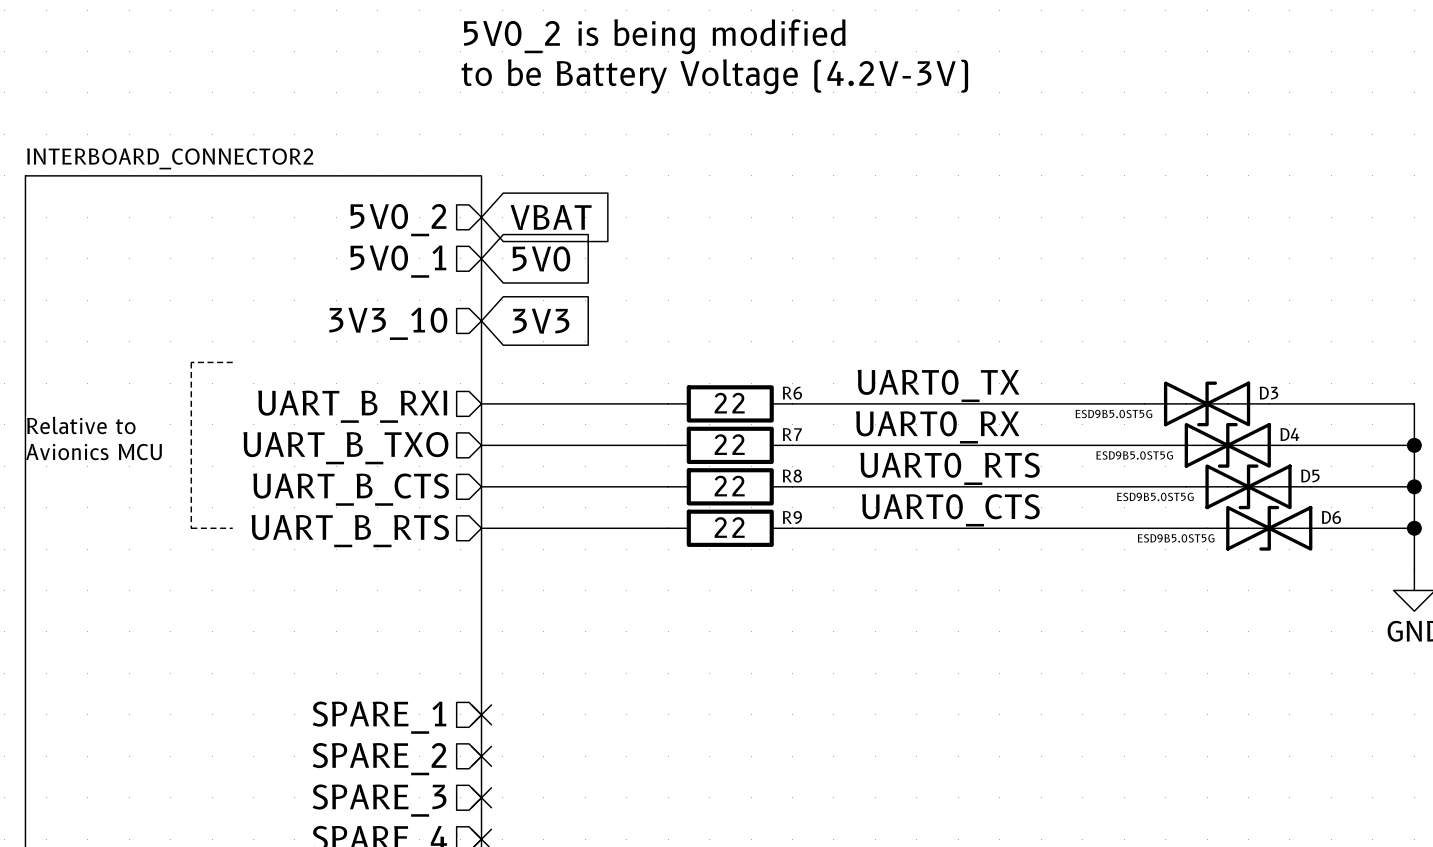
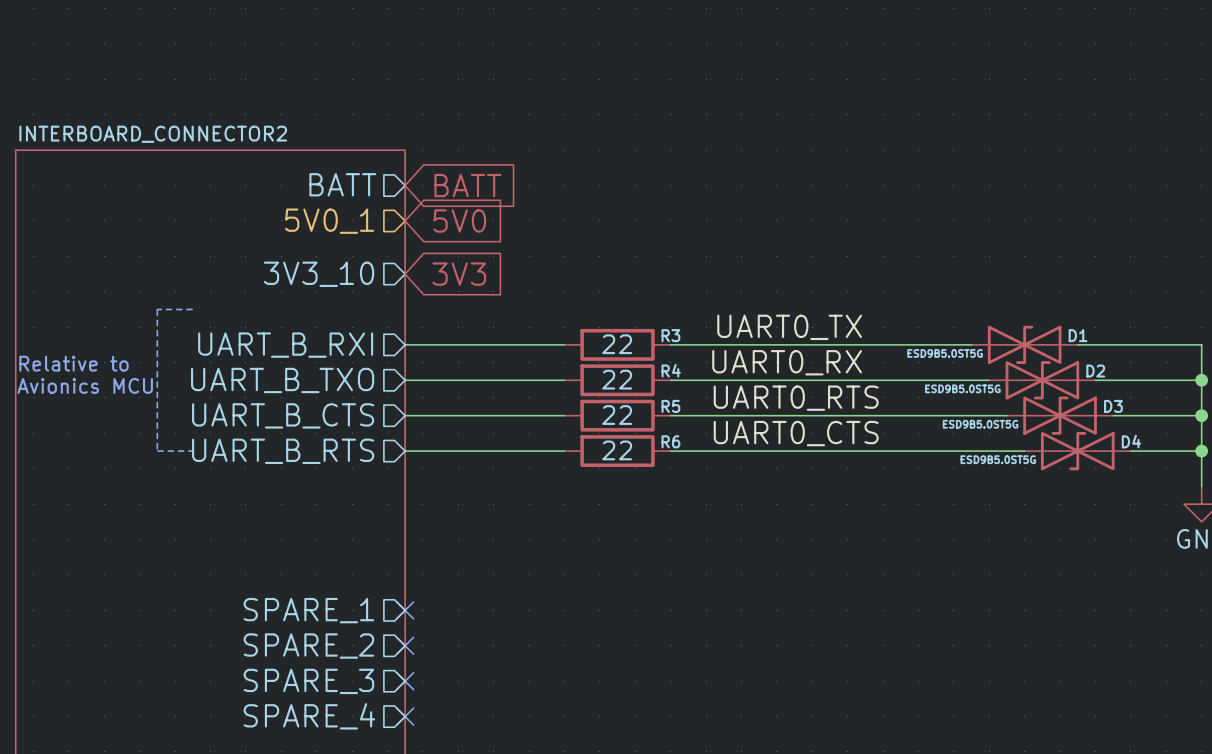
text: 5V0_2 is being modified (654, 36) -> none
text: to be Battery Voltage (4.2V-3V) (714, 76) -> none
global label: VBAT (551, 217) -> BATT (467, 185)
sheet pin: 5V0_2 (398, 220) -> BATT (342, 184)
R6 name: R6 (792, 393) -> R3 (670, 335)
D3 name: D3 (1268, 393) -> D1 (1078, 335)
R7 name: R7 (792, 434) -> R4 (671, 370)
D4 name: D4 (1289, 434) -> D2 (1095, 371)
R8 name: R8 (792, 476) -> R5 (670, 406)
D5 name: D5 (1310, 476) -> D3 (1113, 406)
R9 name: R9 (792, 517) -> R6 (670, 441)
D6 name: D6 (1331, 517) -> D4 (1131, 441)

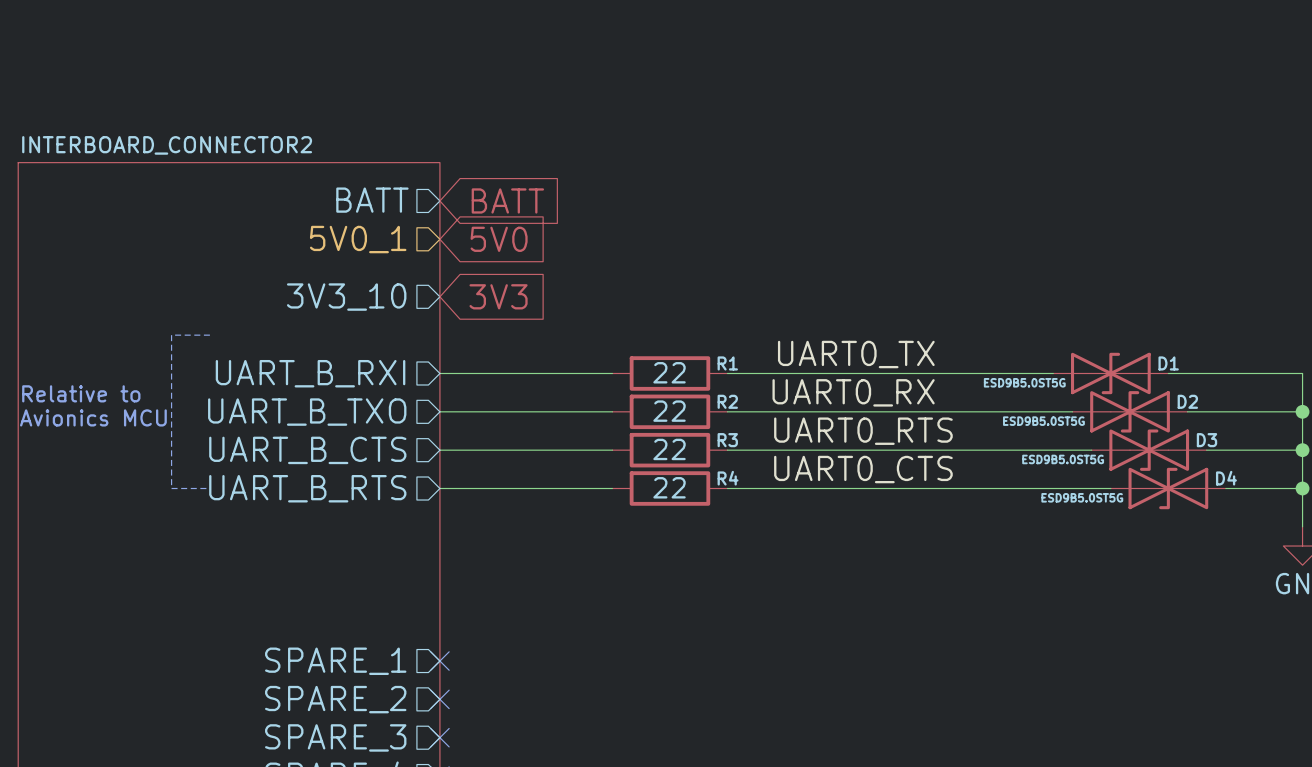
R3 name: R3 (670, 335) -> R1 (727, 363)
R4 name: R4 (671, 370) -> R2 (727, 401)
R5 name: R5 (670, 406) -> R3 (727, 440)
R6 name: R6 (670, 441) -> R4 (728, 478)

